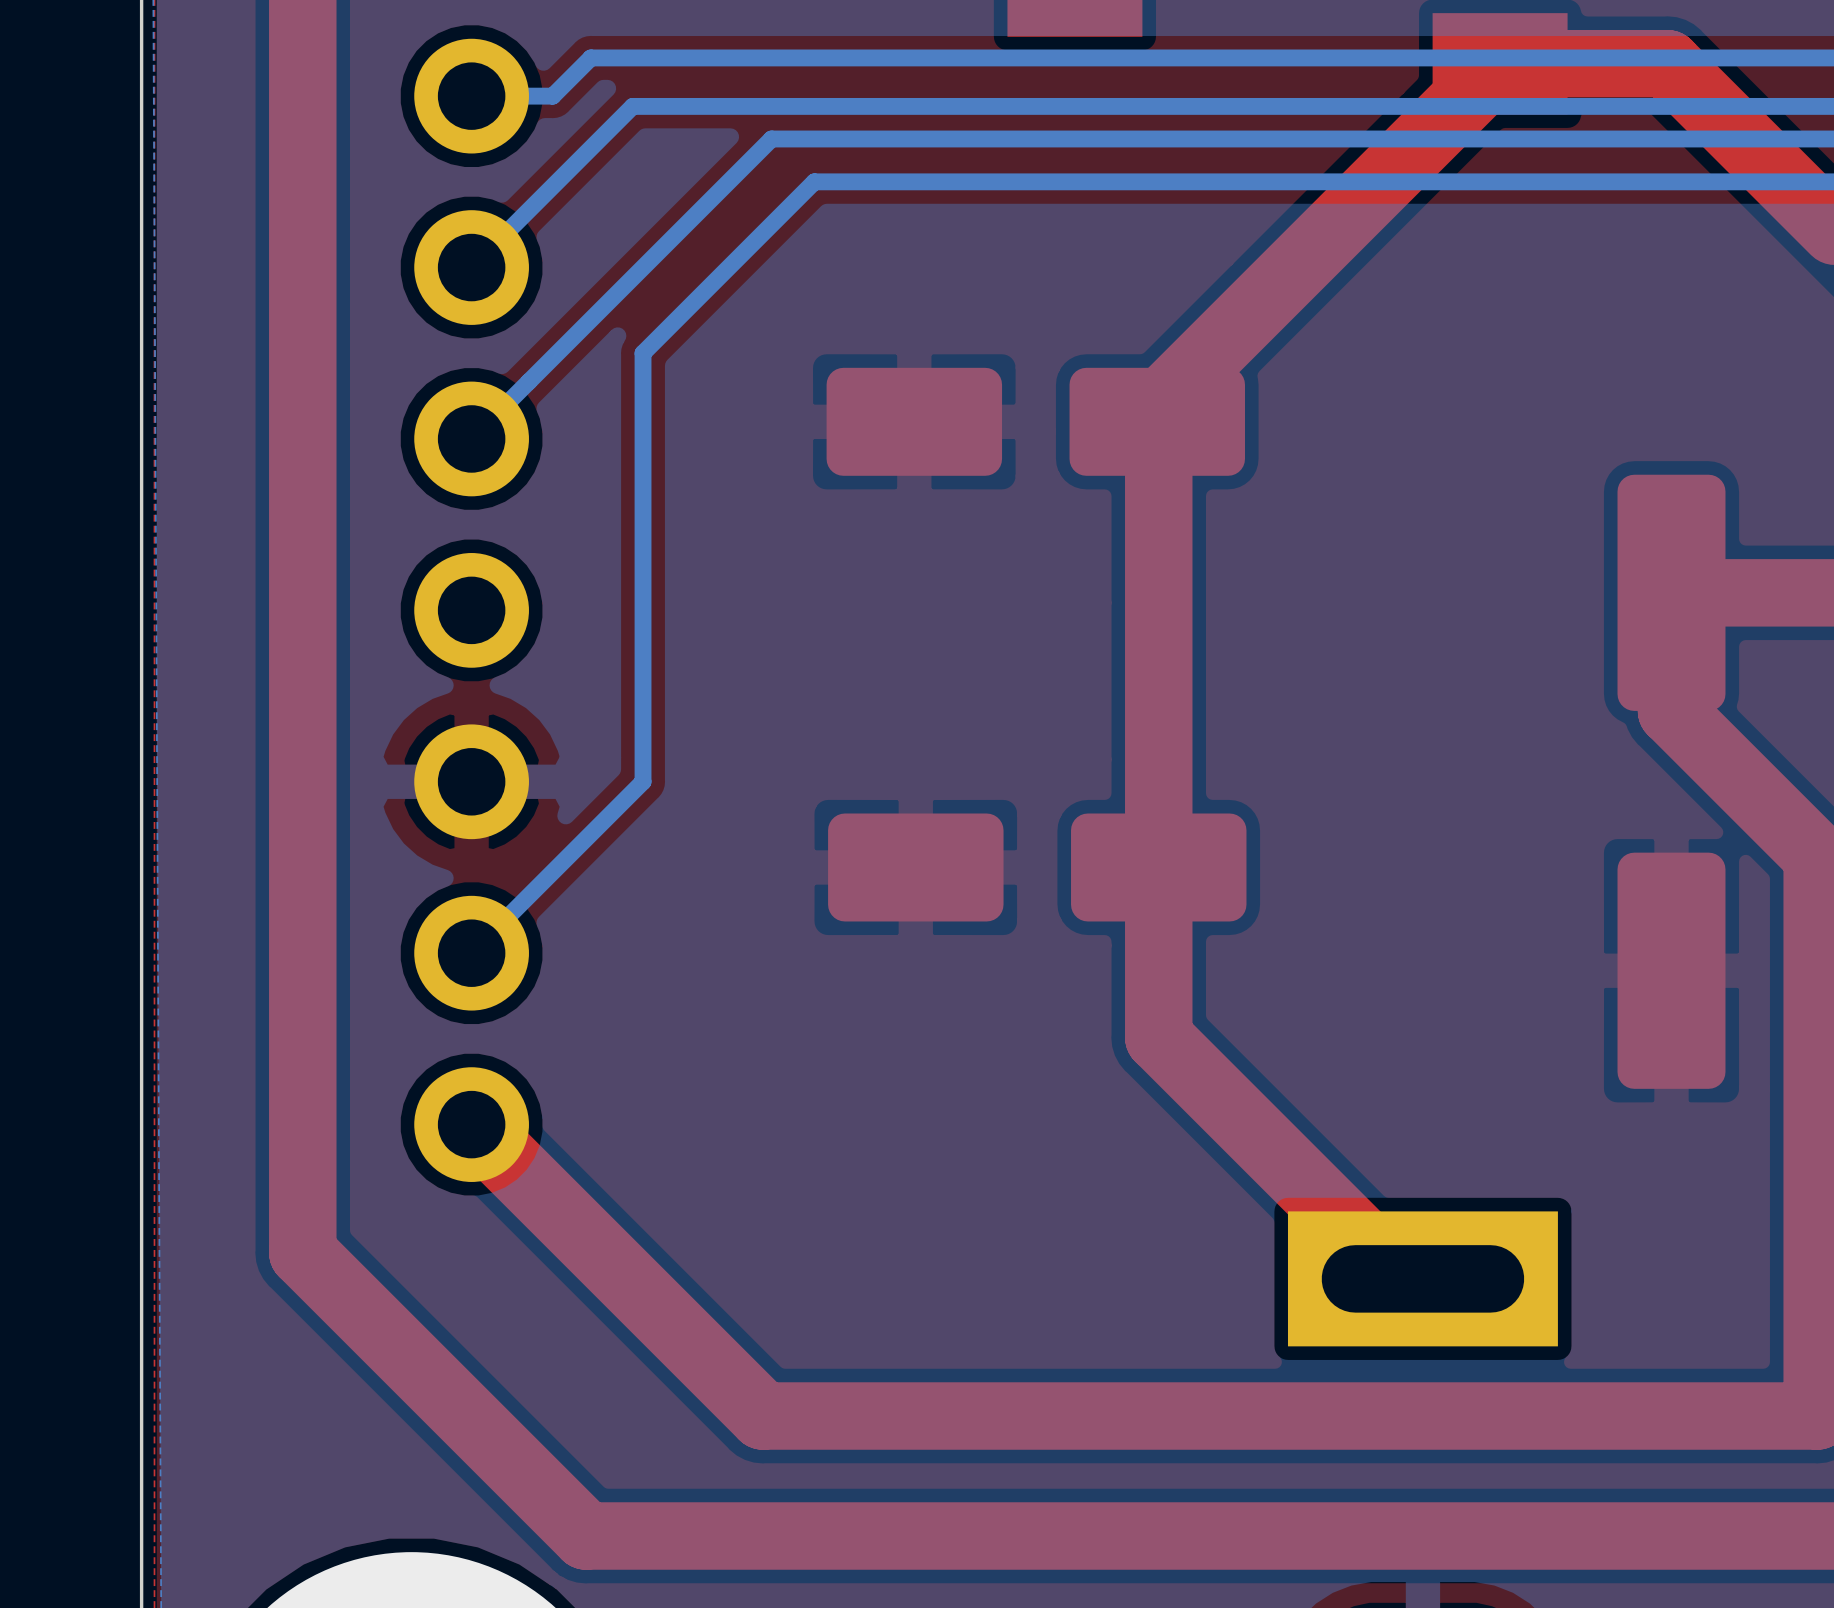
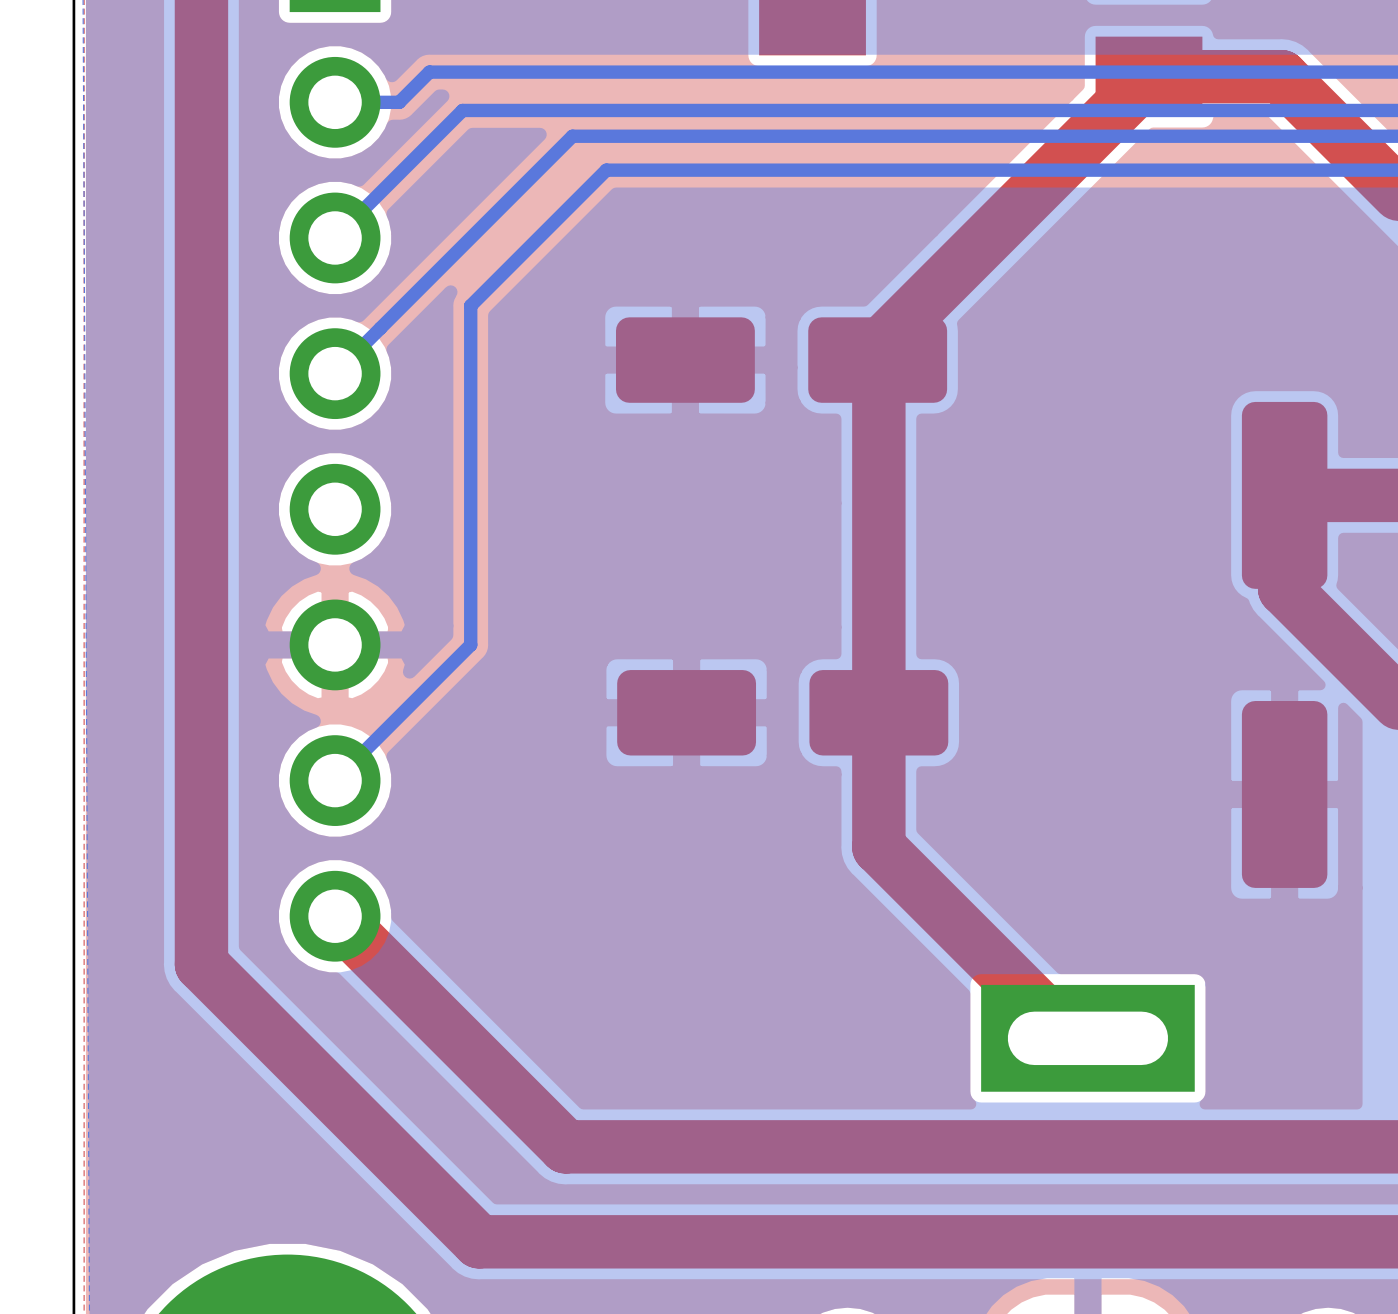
top track: (302, 1185) (302, 1252) (586, 1536) (653, 1536) -> (201, 964) (479, 1241)

